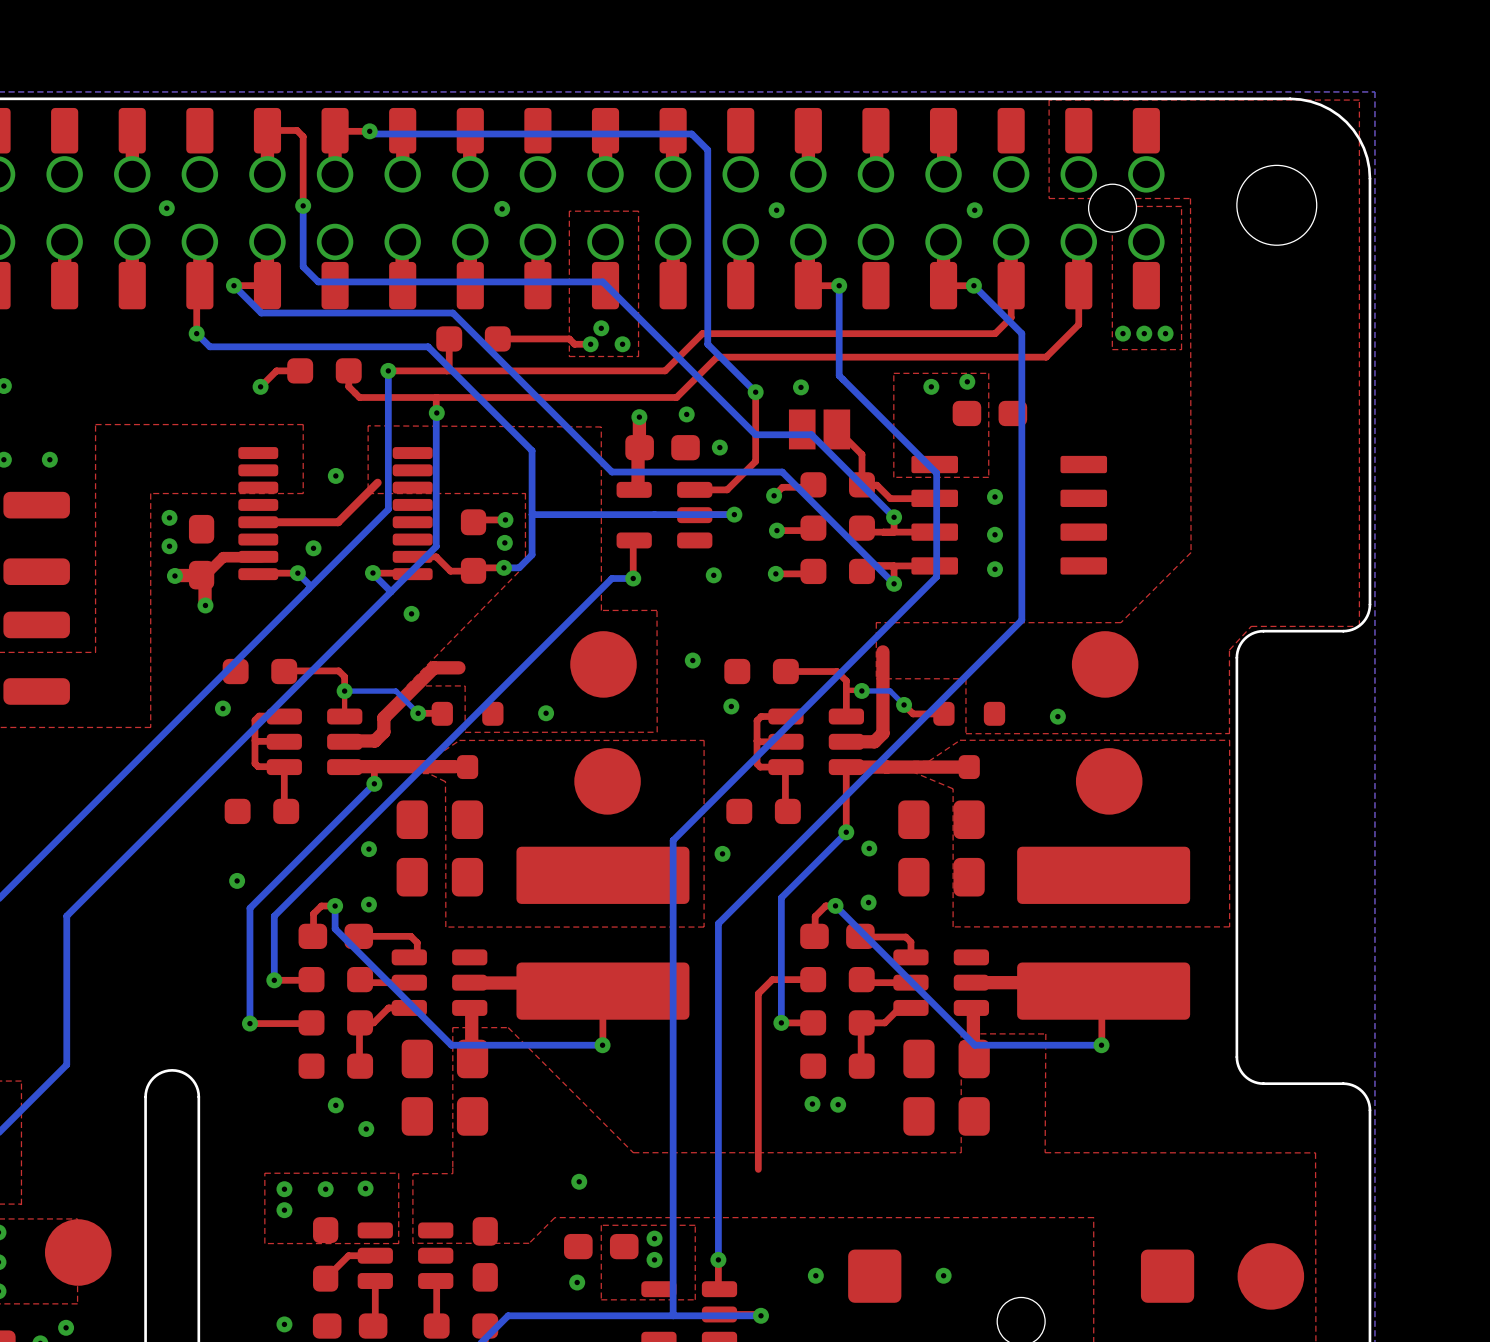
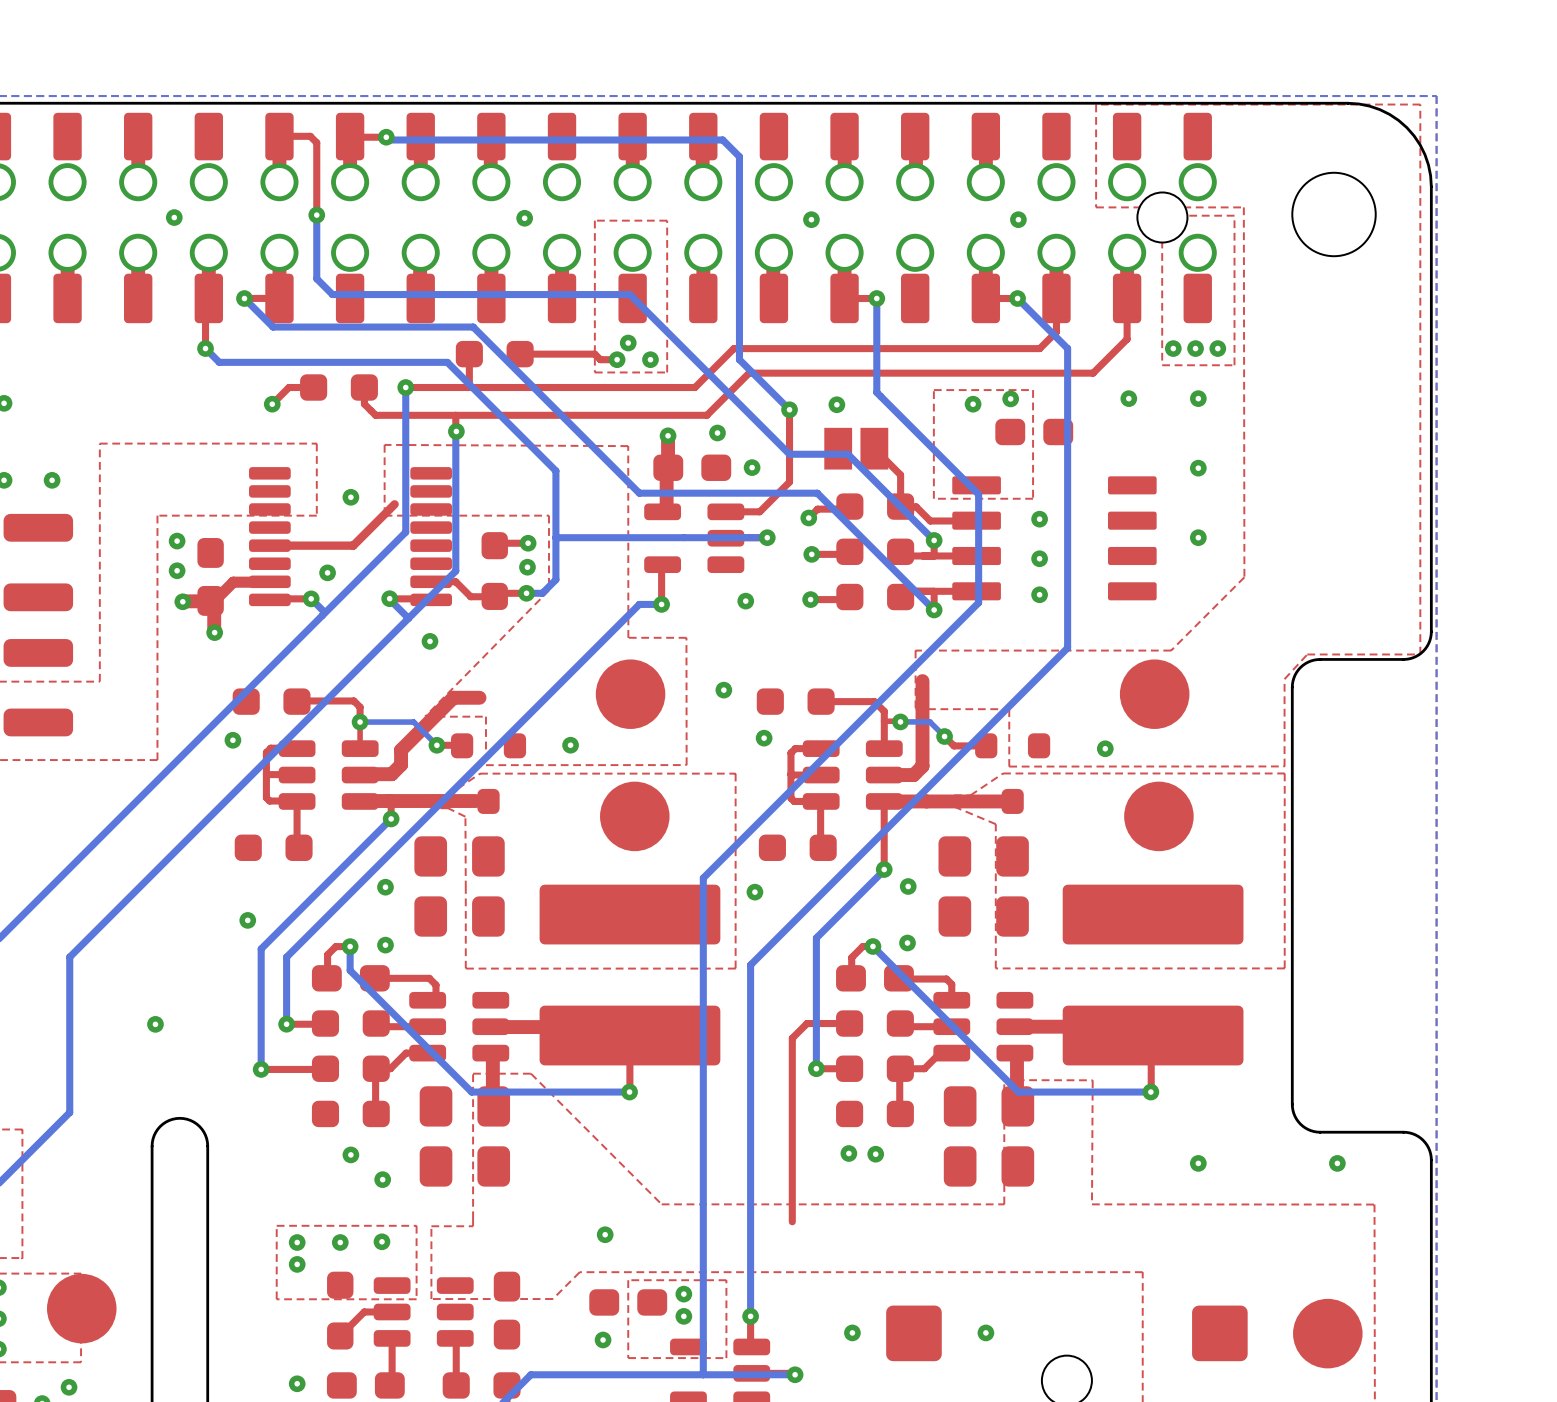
via: none -> (1128, 398)
via: none -> (1198, 398)
via: none -> (1198, 468)
via: none -> (1198, 537)
via: none -> (155, 1024)
via: none -> (1198, 1163)
via: none -> (1337, 1163)

